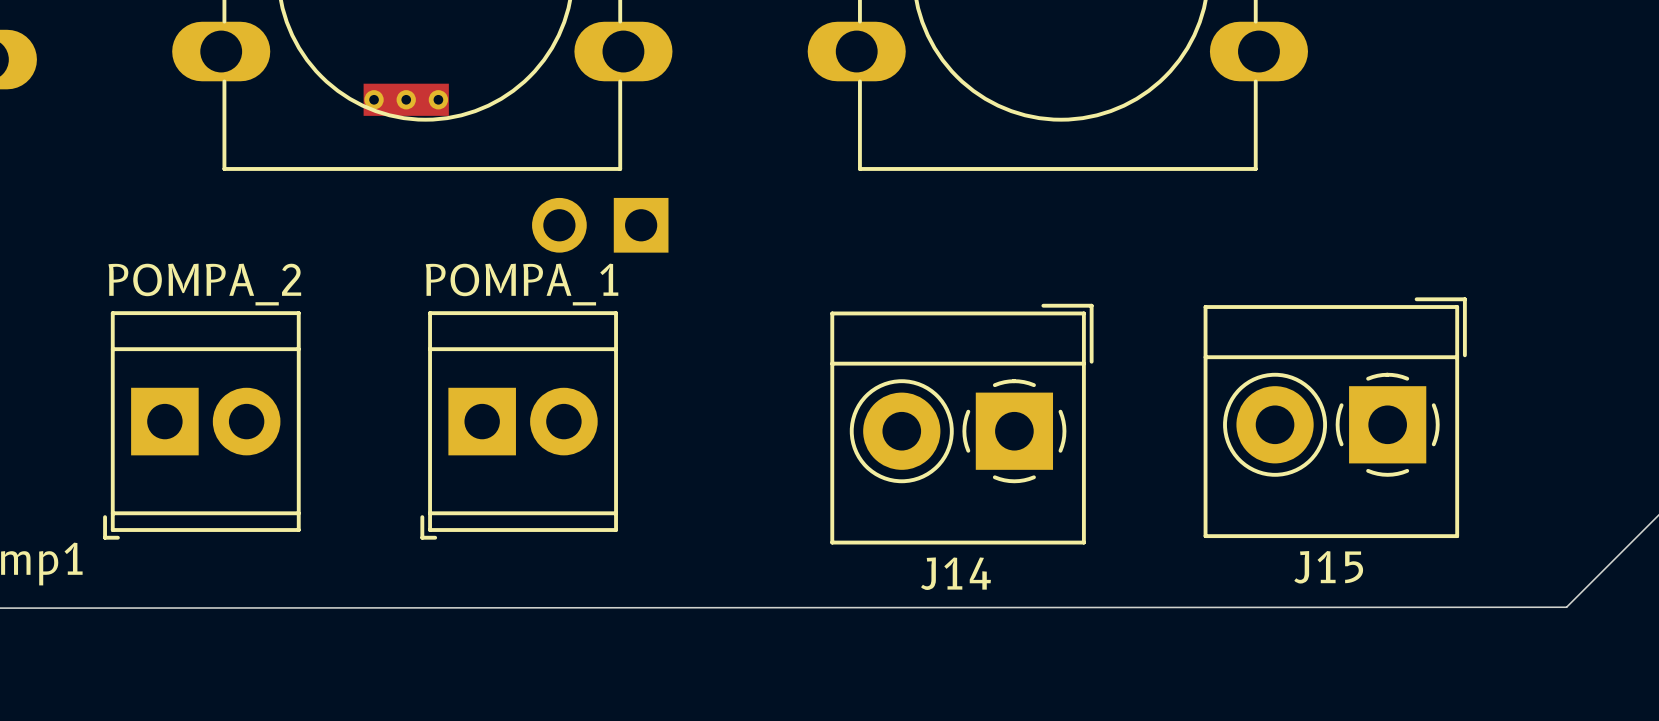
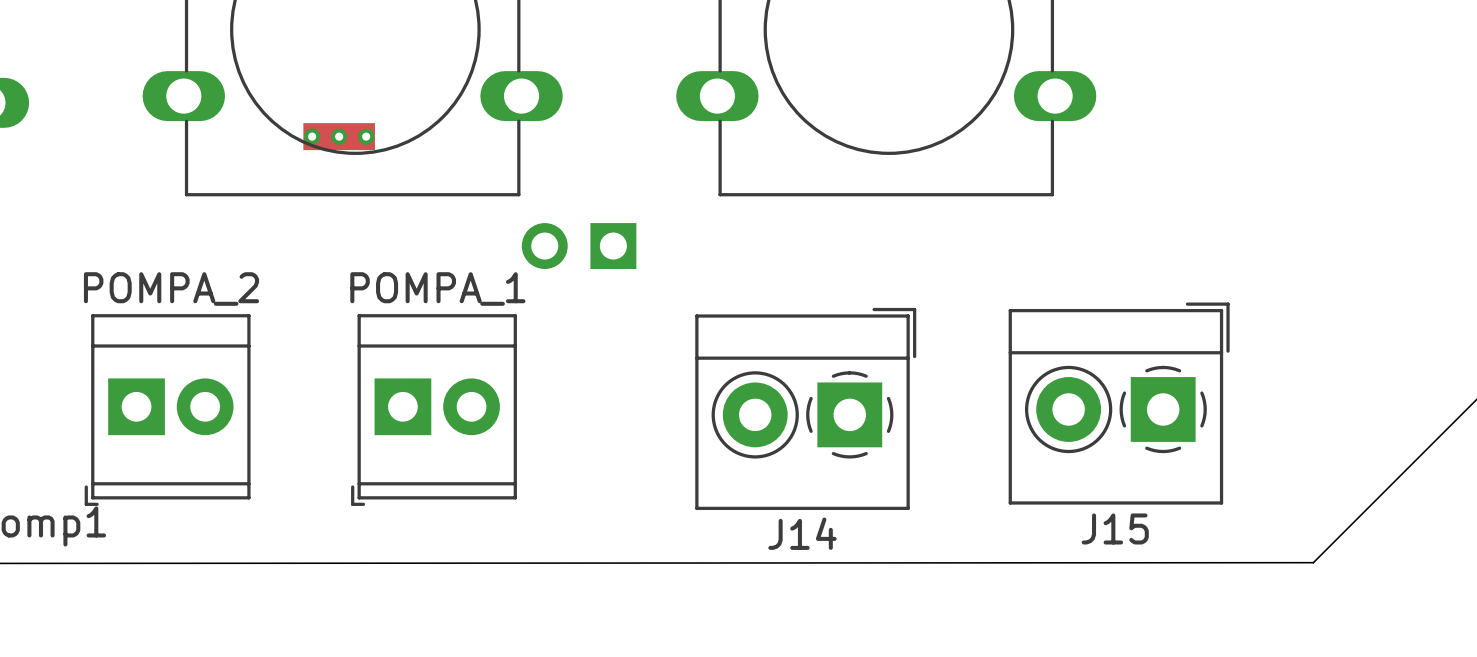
part position: (600, 225) -> (579, 246)

